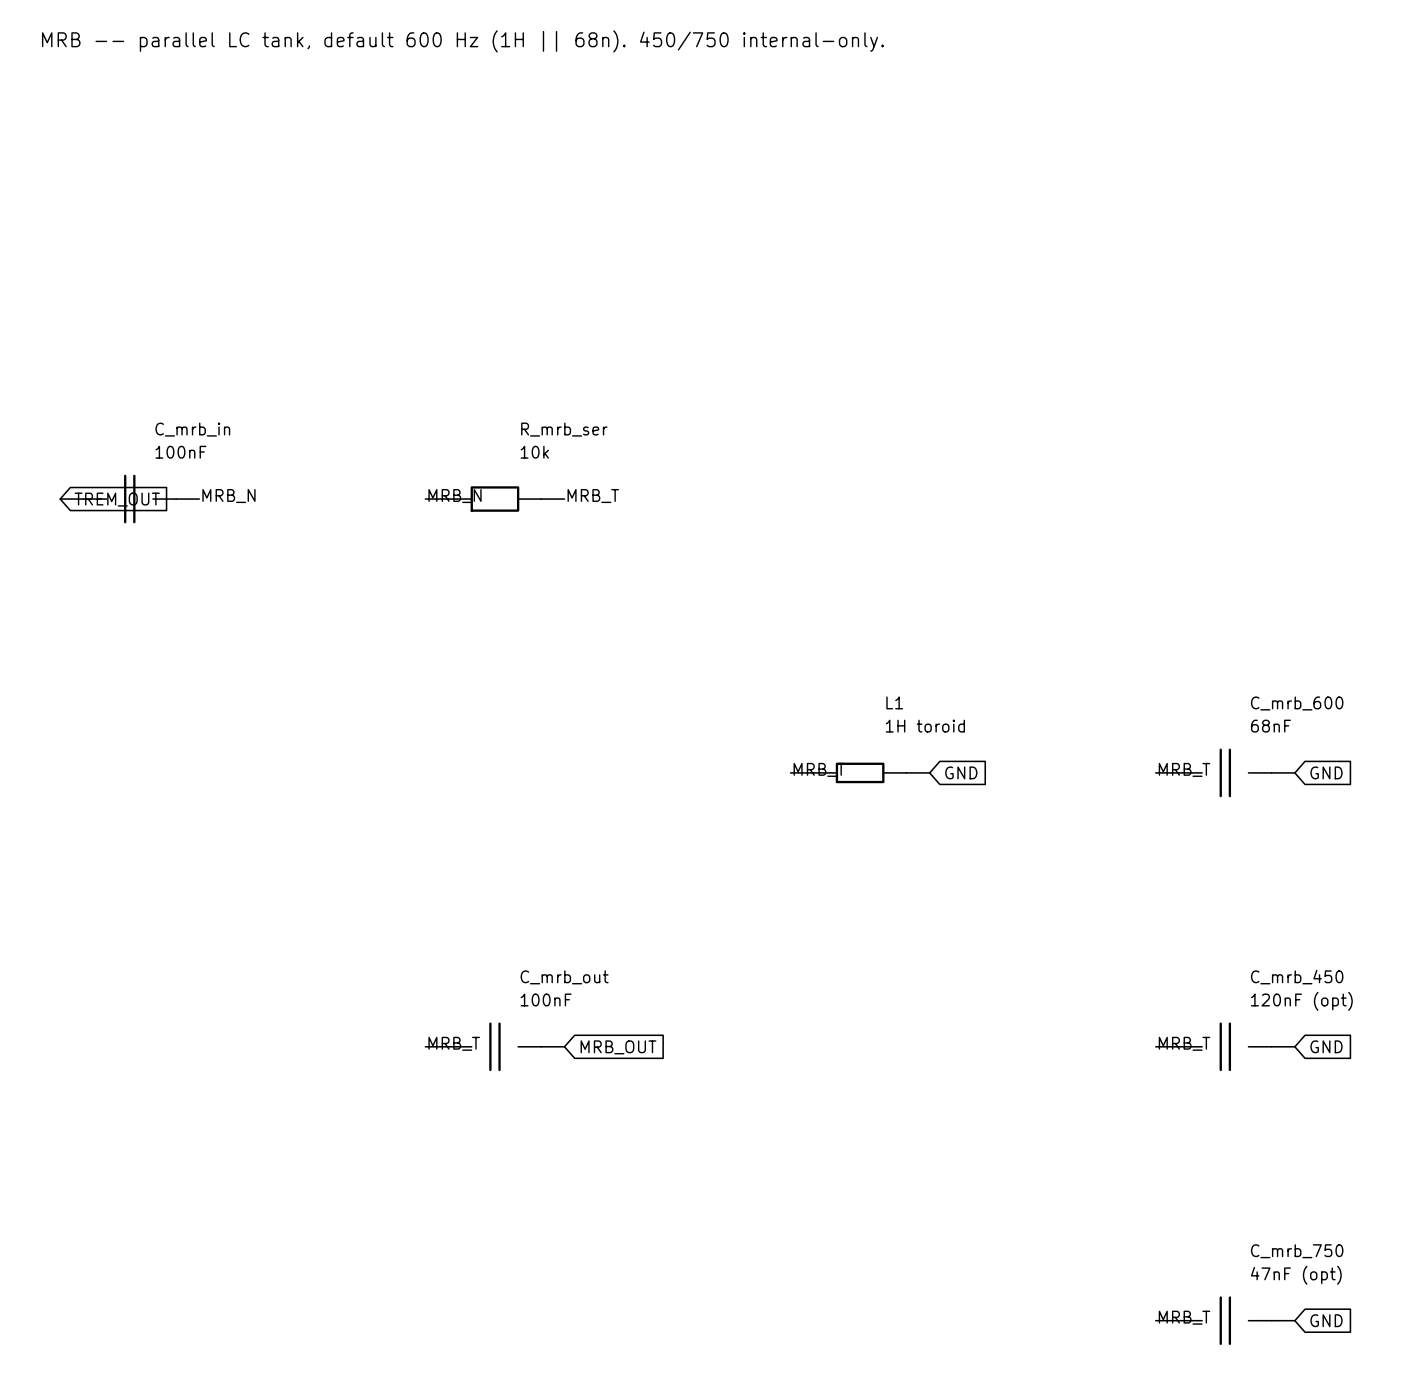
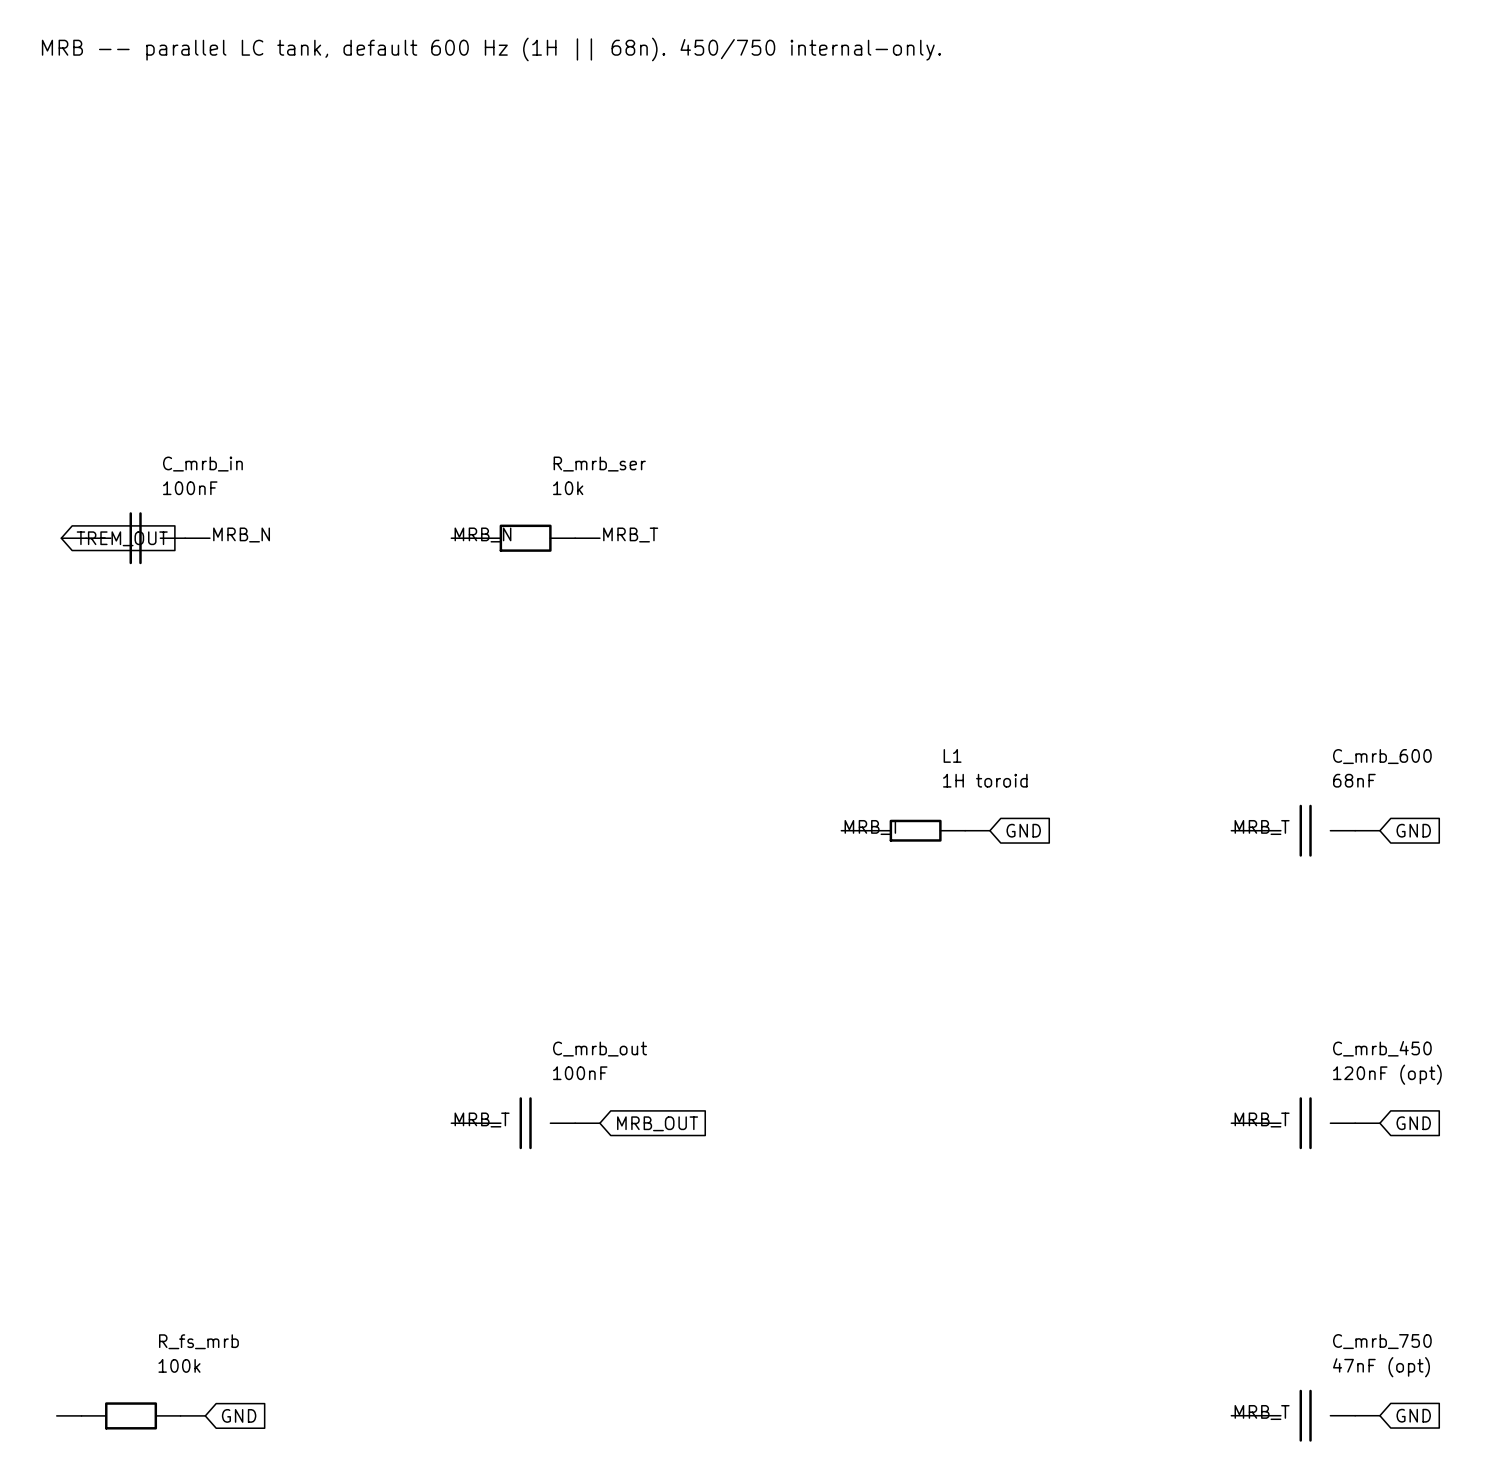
wire: none -> (56, 1415) (81, 1415)
R_fs_mrb: none -> 100k (131, 1415)
wire: none -> (180, 1415) (205, 1415)
global label: none -> GND (239, 1415)

